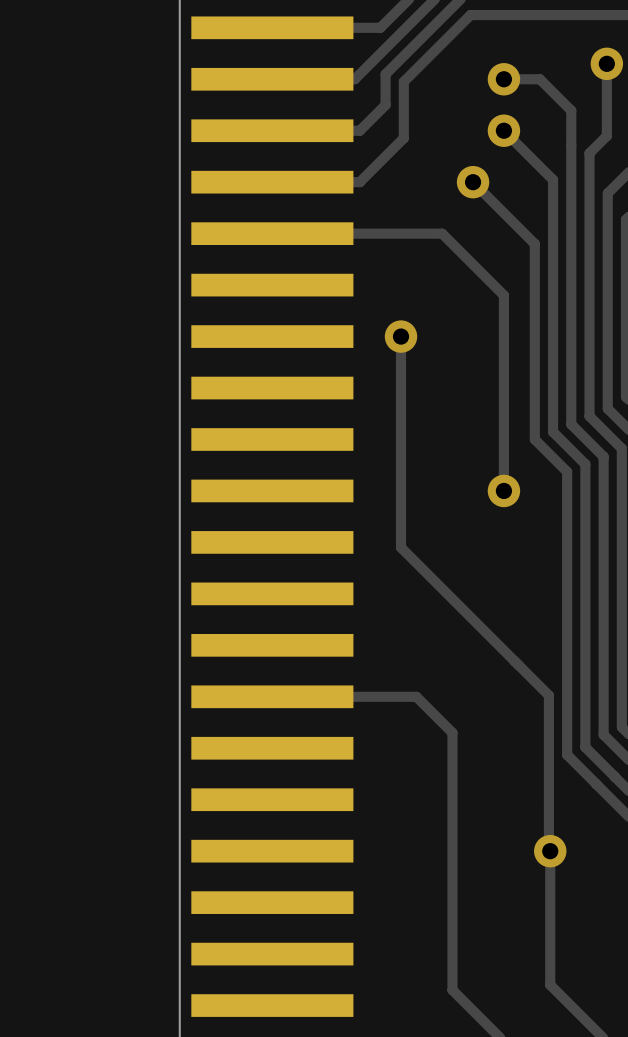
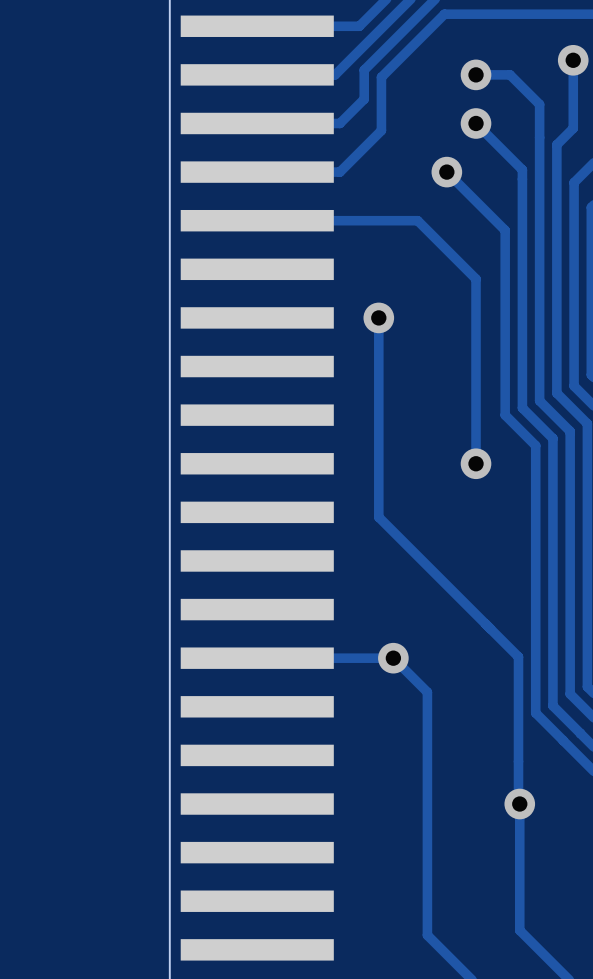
via: none -> (393, 658)

